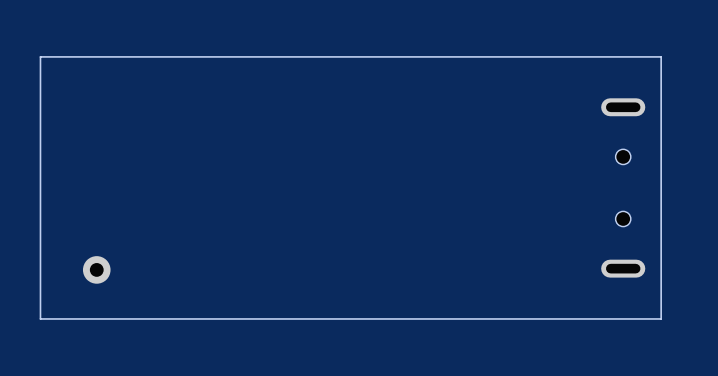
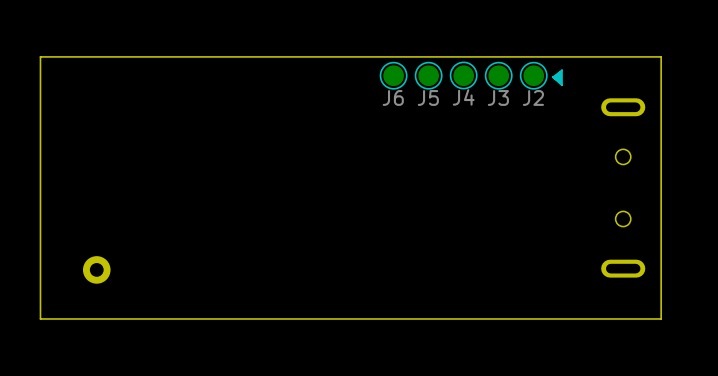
J6: none -> (393, 75)
J5: none -> (428, 75)
J4: none -> (463, 75)
J3: none -> (498, 75)
J2: none -> (533, 75)
line: none -> (558, 76) (558, 78) (556, 77) (559, 74) (559, 80) (555, 77) (560, 71) (560, 82) (552, 77)
line: none -> (552, 77) (562, 85) (562, 70) (552, 77)

